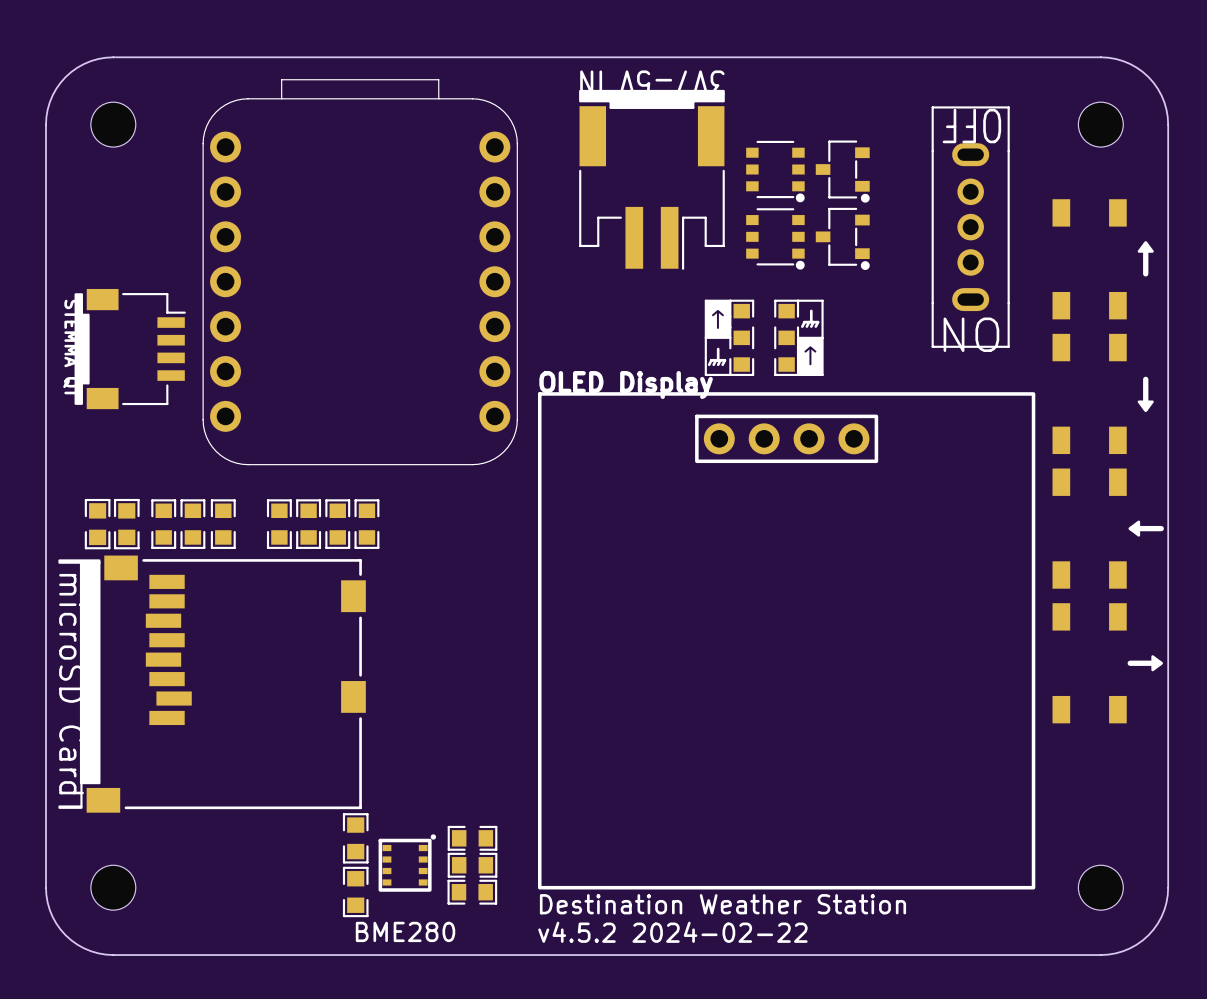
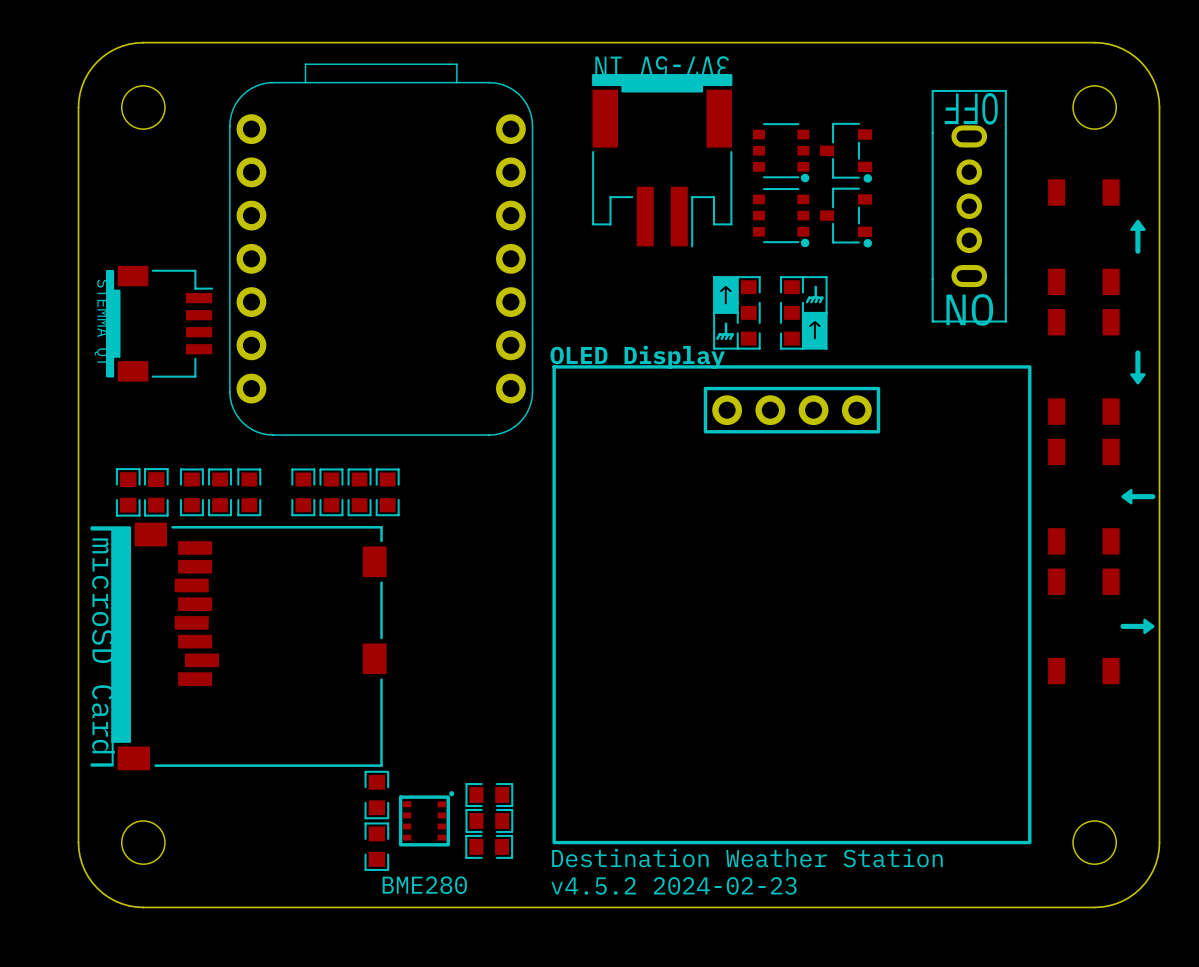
text: v4.5.2 2024-02-22 (672, 932) -> v4.5.2 2024-02-23 (674, 885)

